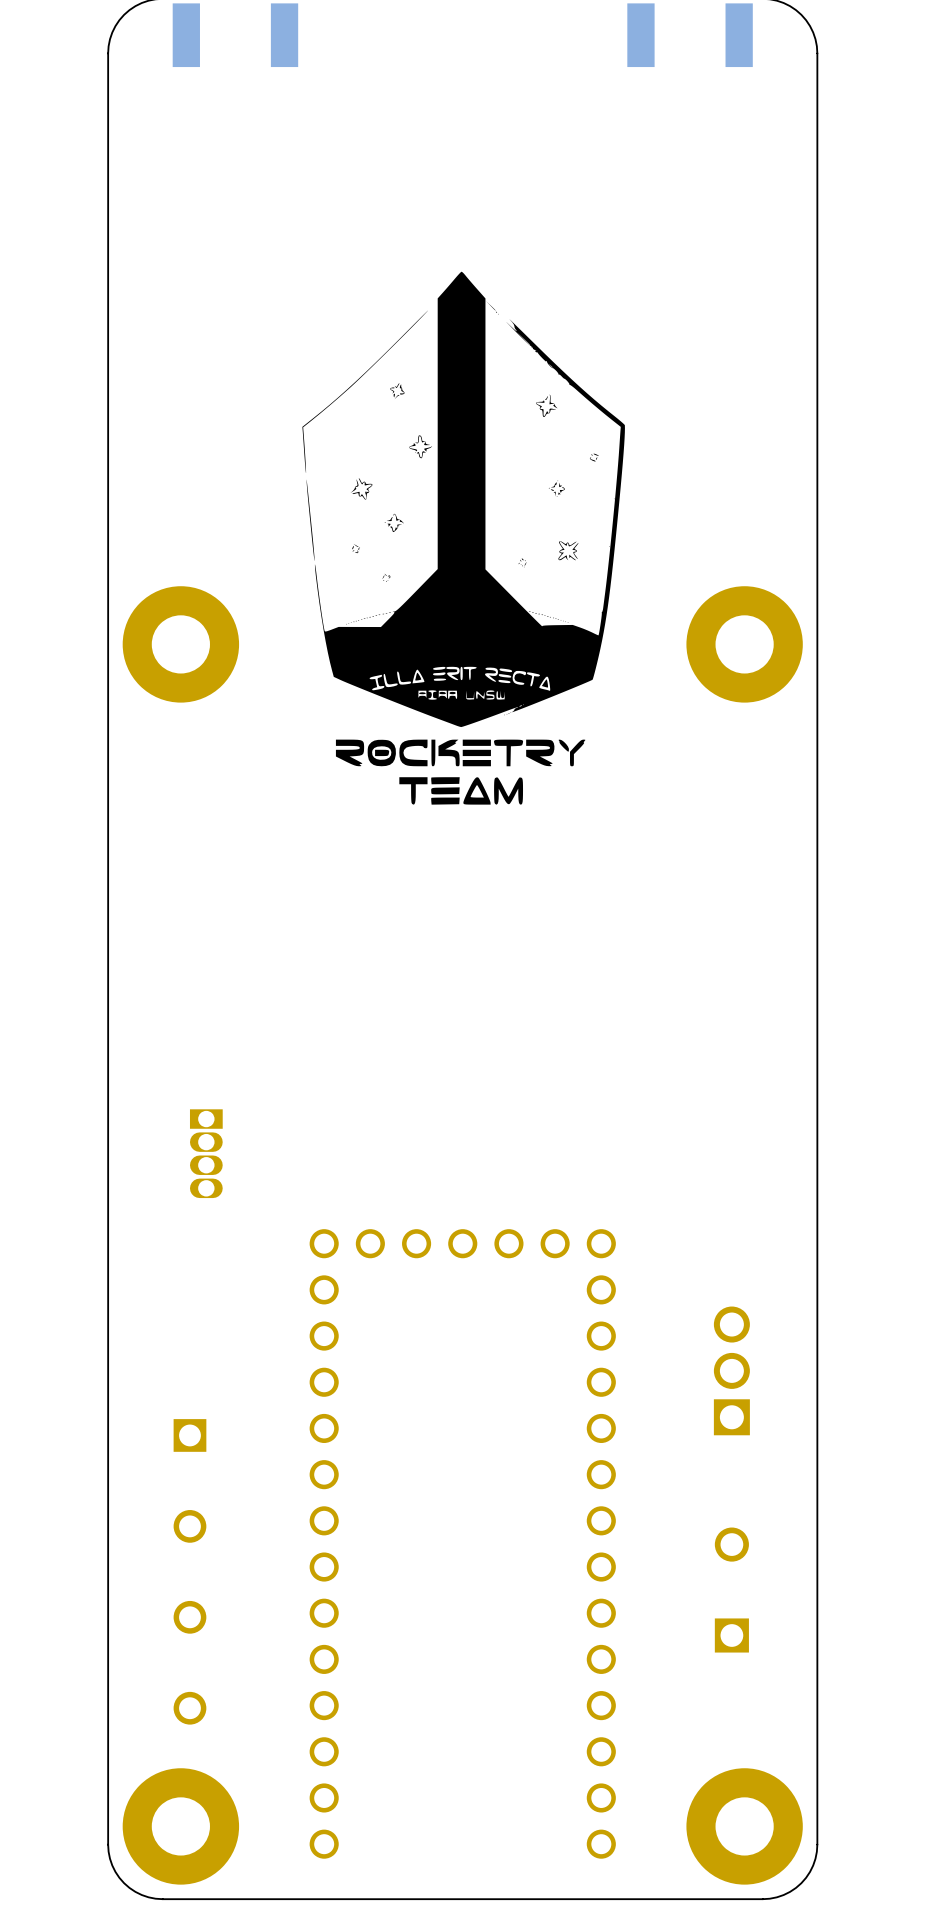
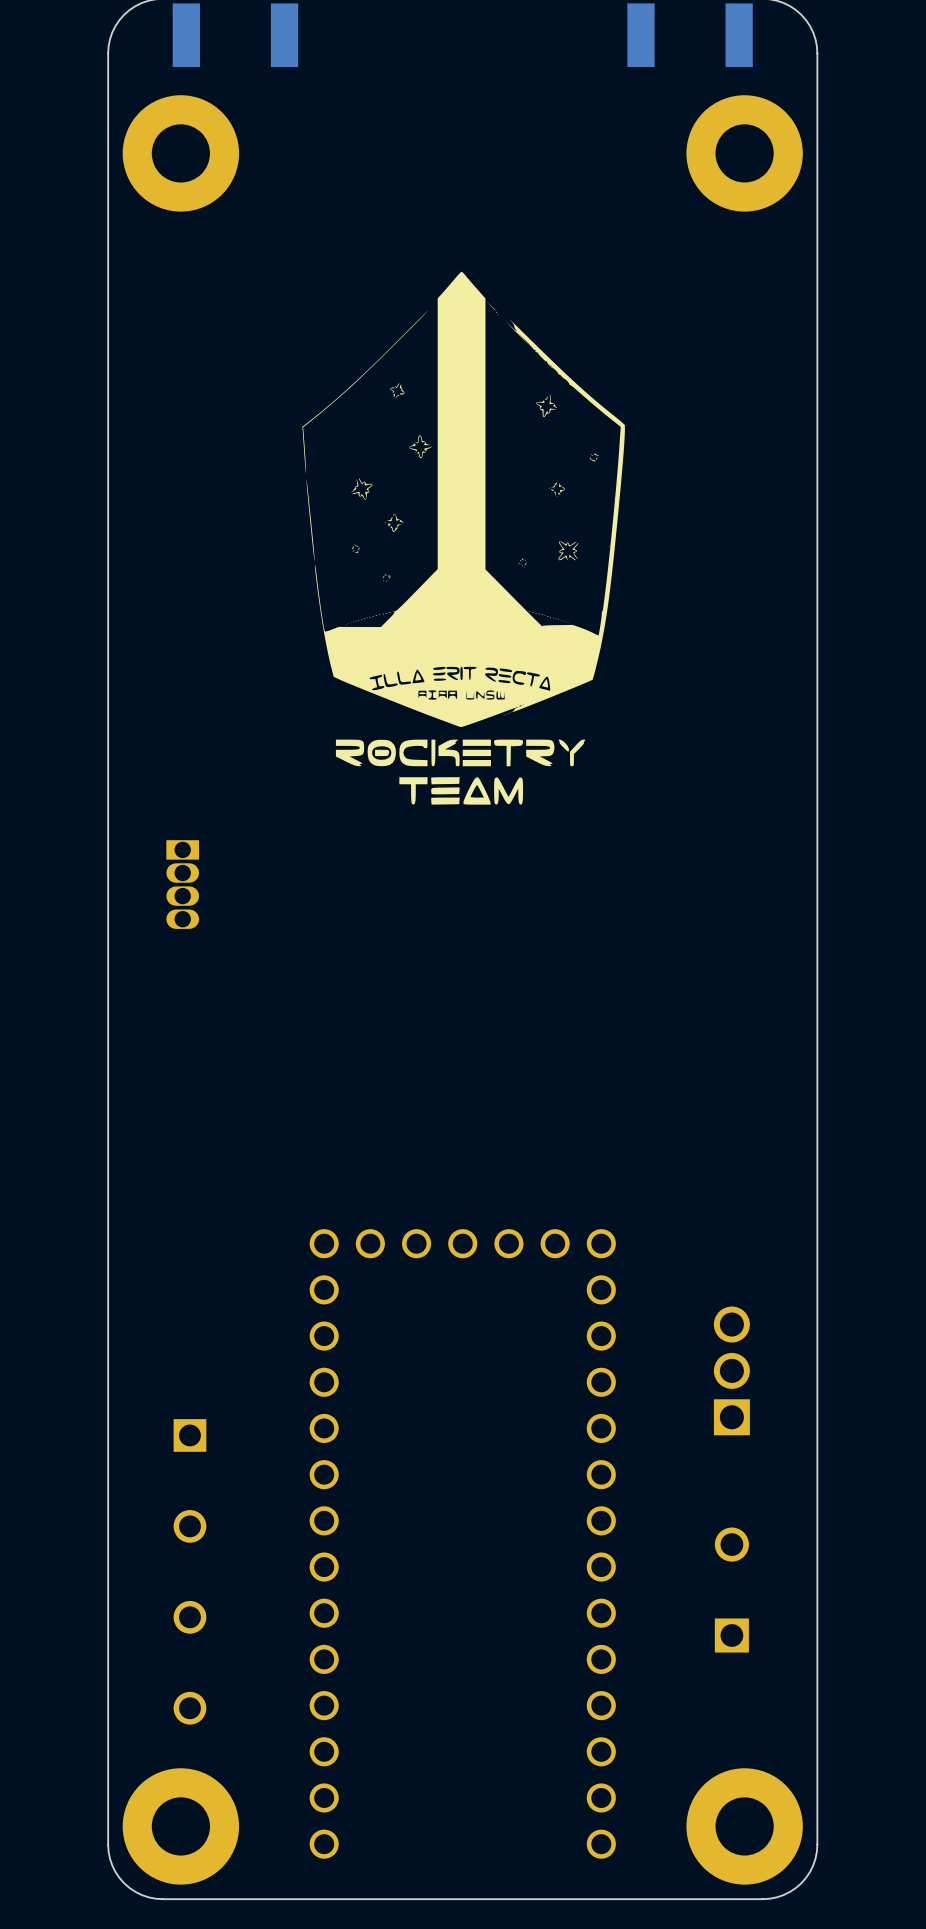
part: none -> (180, 153)
part: none -> (744, 153)
part: (180, 644) -> none
part: (744, 644) -> none
part position: (206, 1153) -> (182, 884)

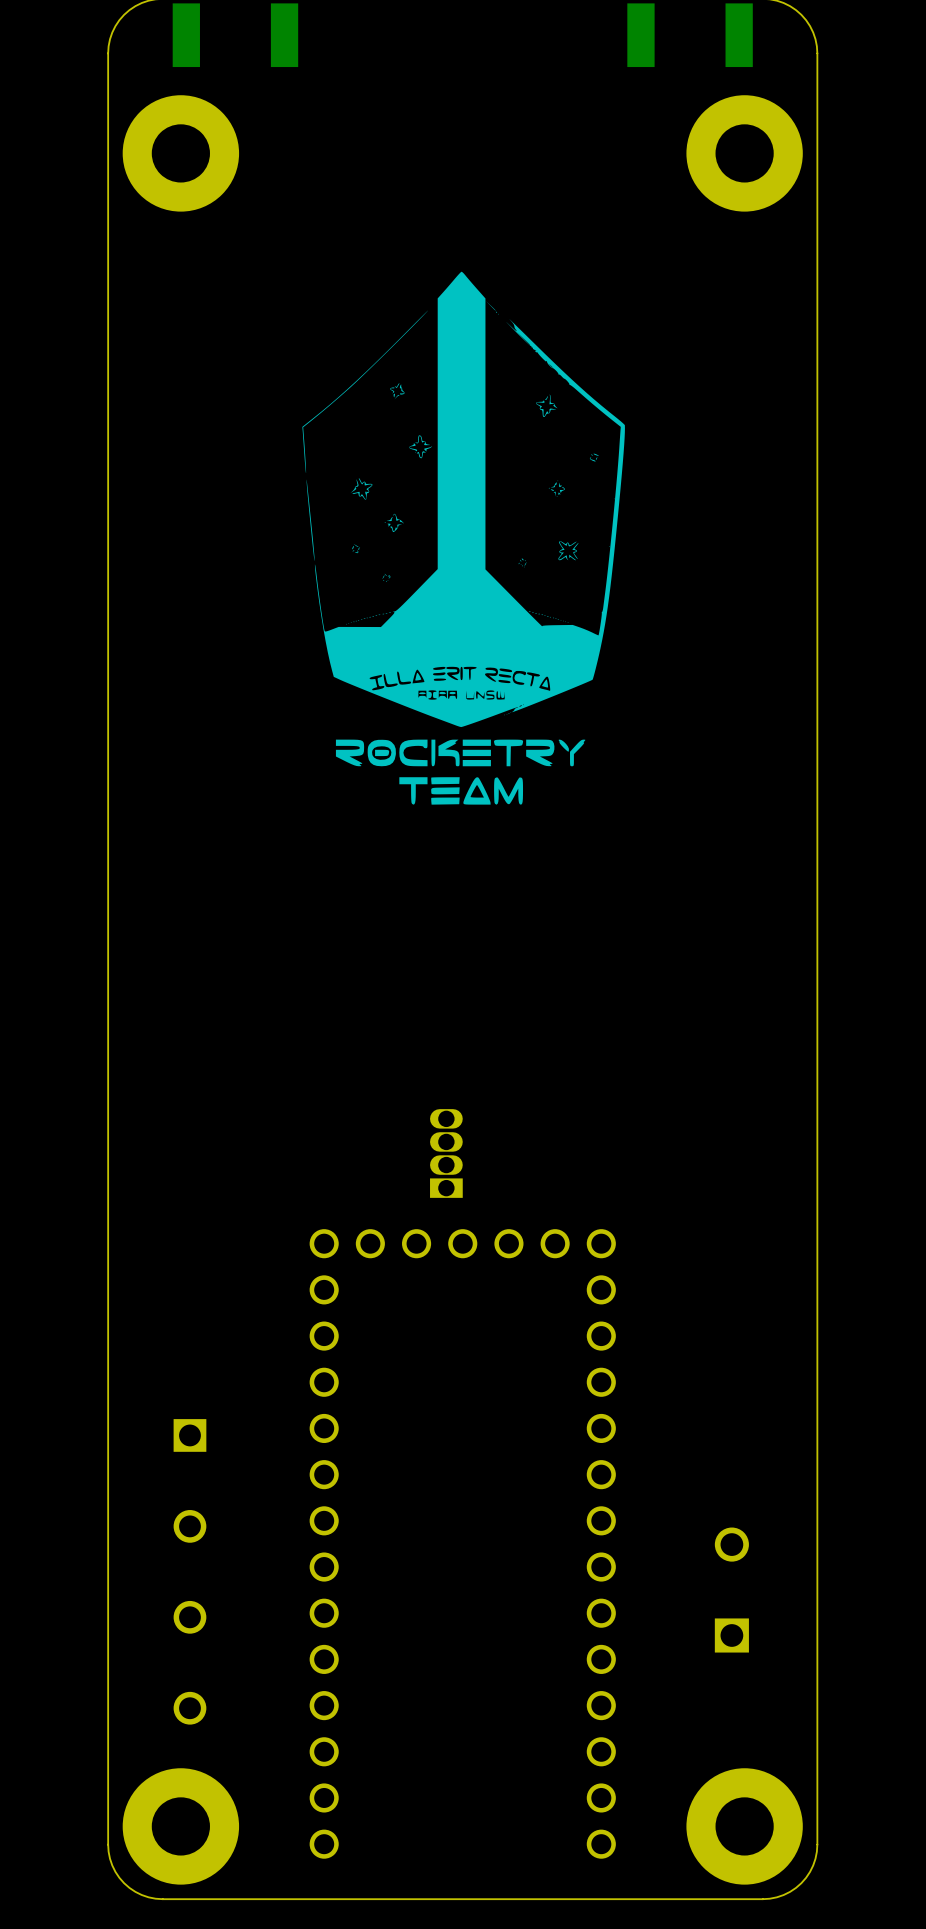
part rotation: 0° (182, 884) -> 180° (446, 1153)
part position: (182, 884) -> (446, 1153)
part: (731, 1370) -> none

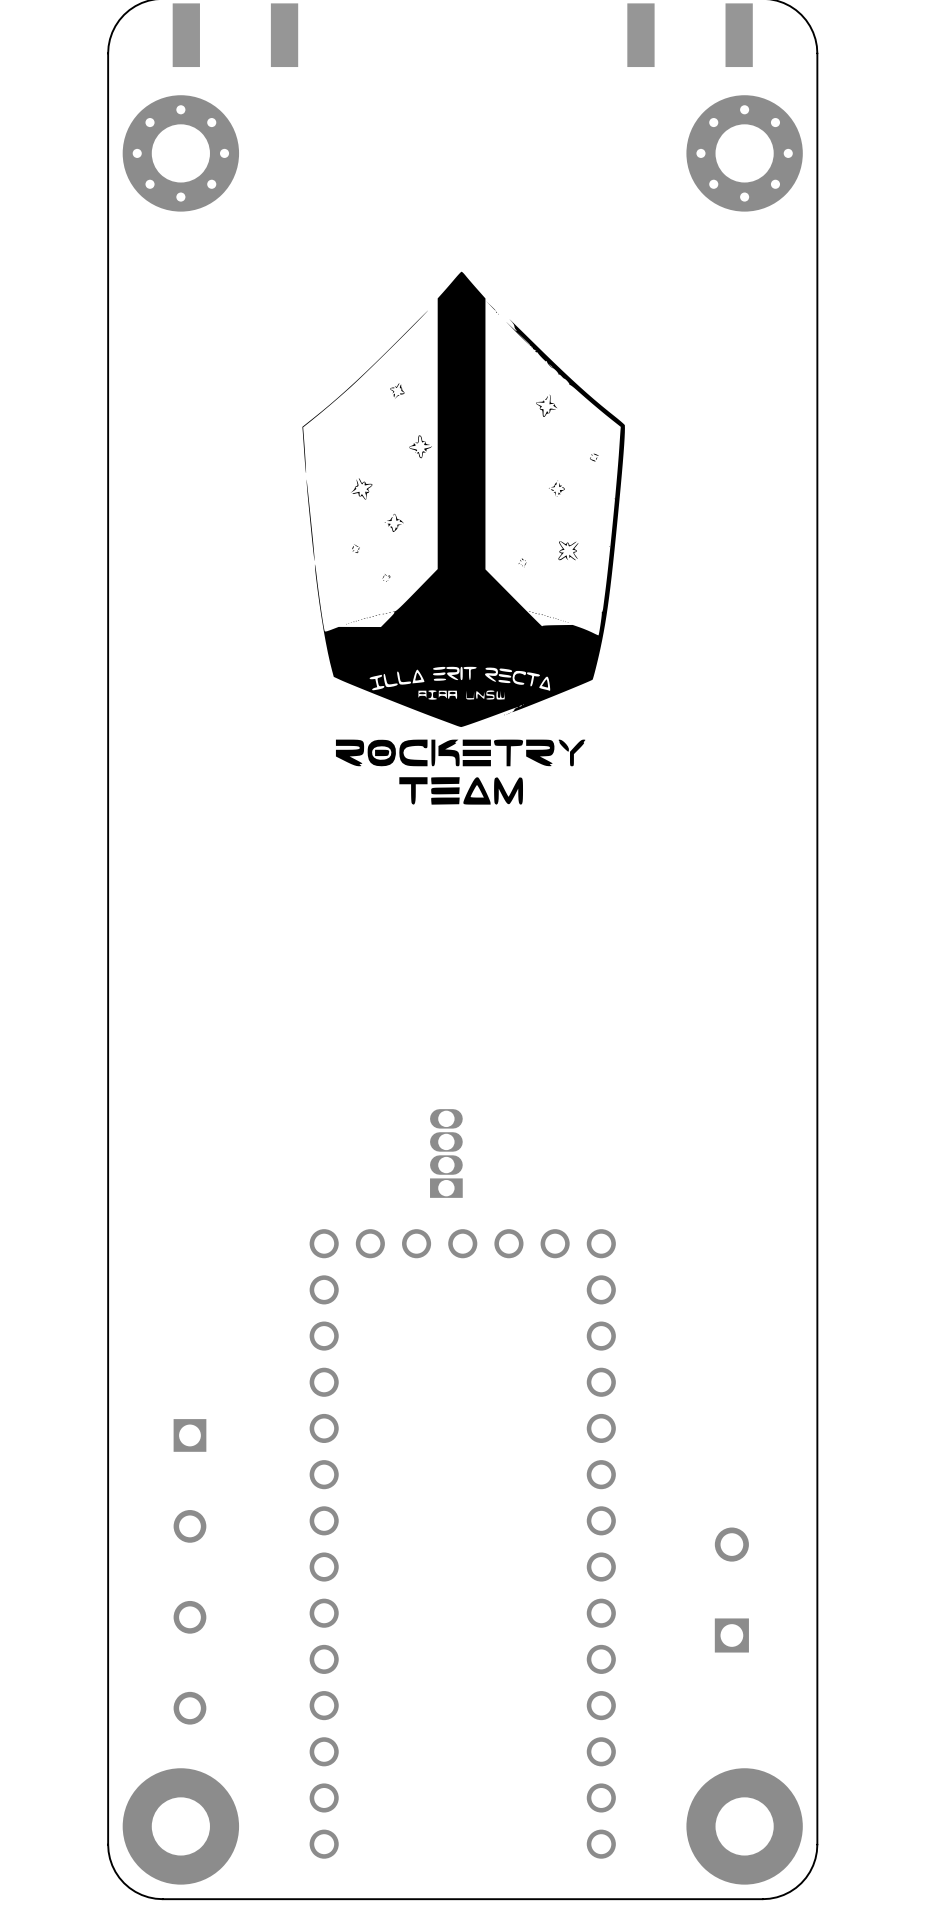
part footprint: [122, 95, 240, 212] -> [122, 95, 240, 212]
part footprint: [686, 95, 803, 212] -> [686, 95, 803, 212]

